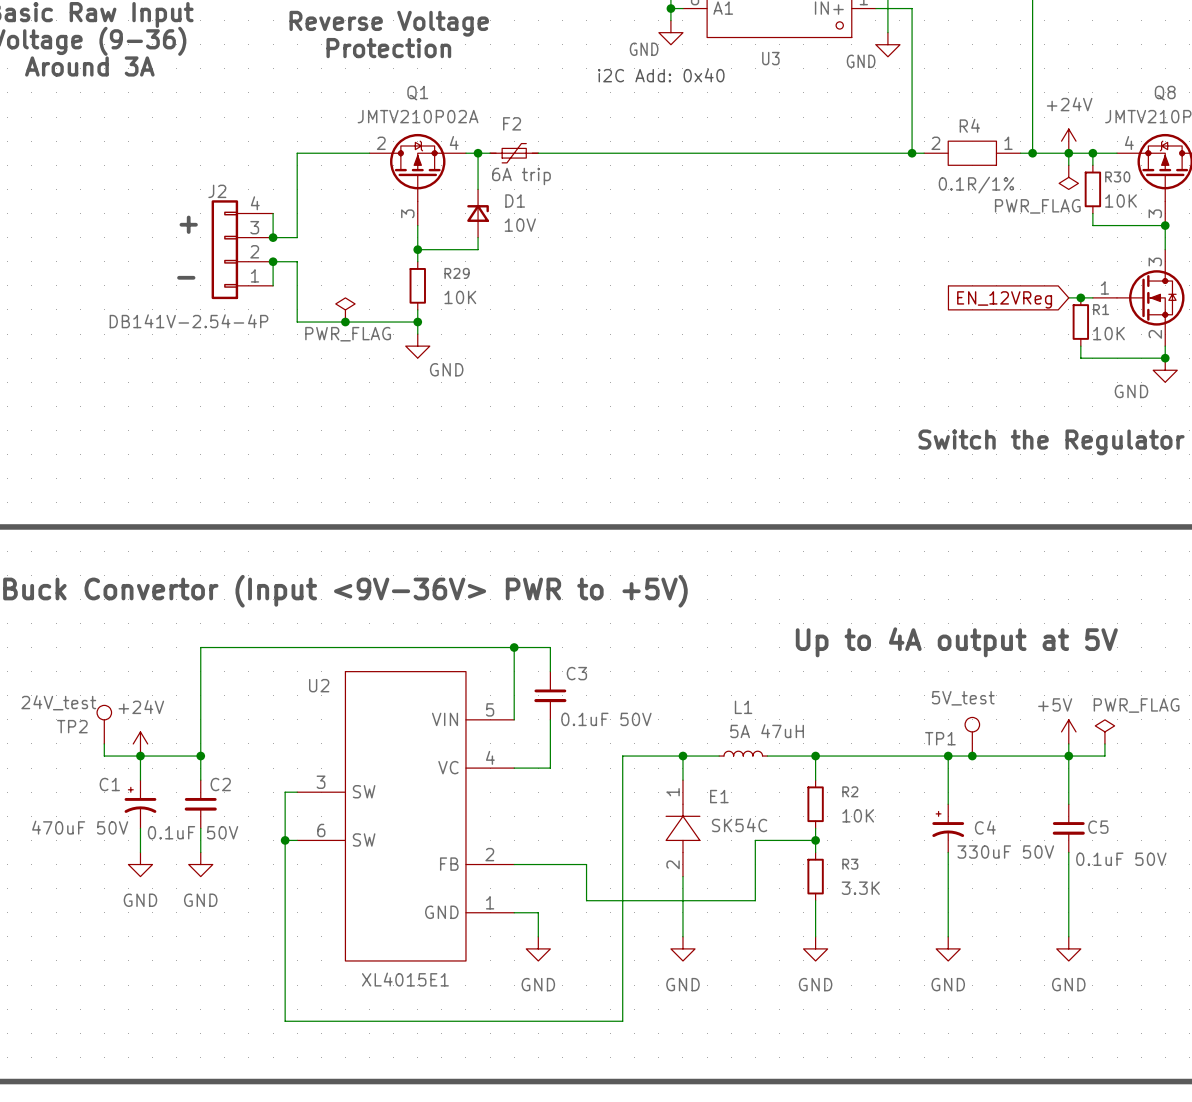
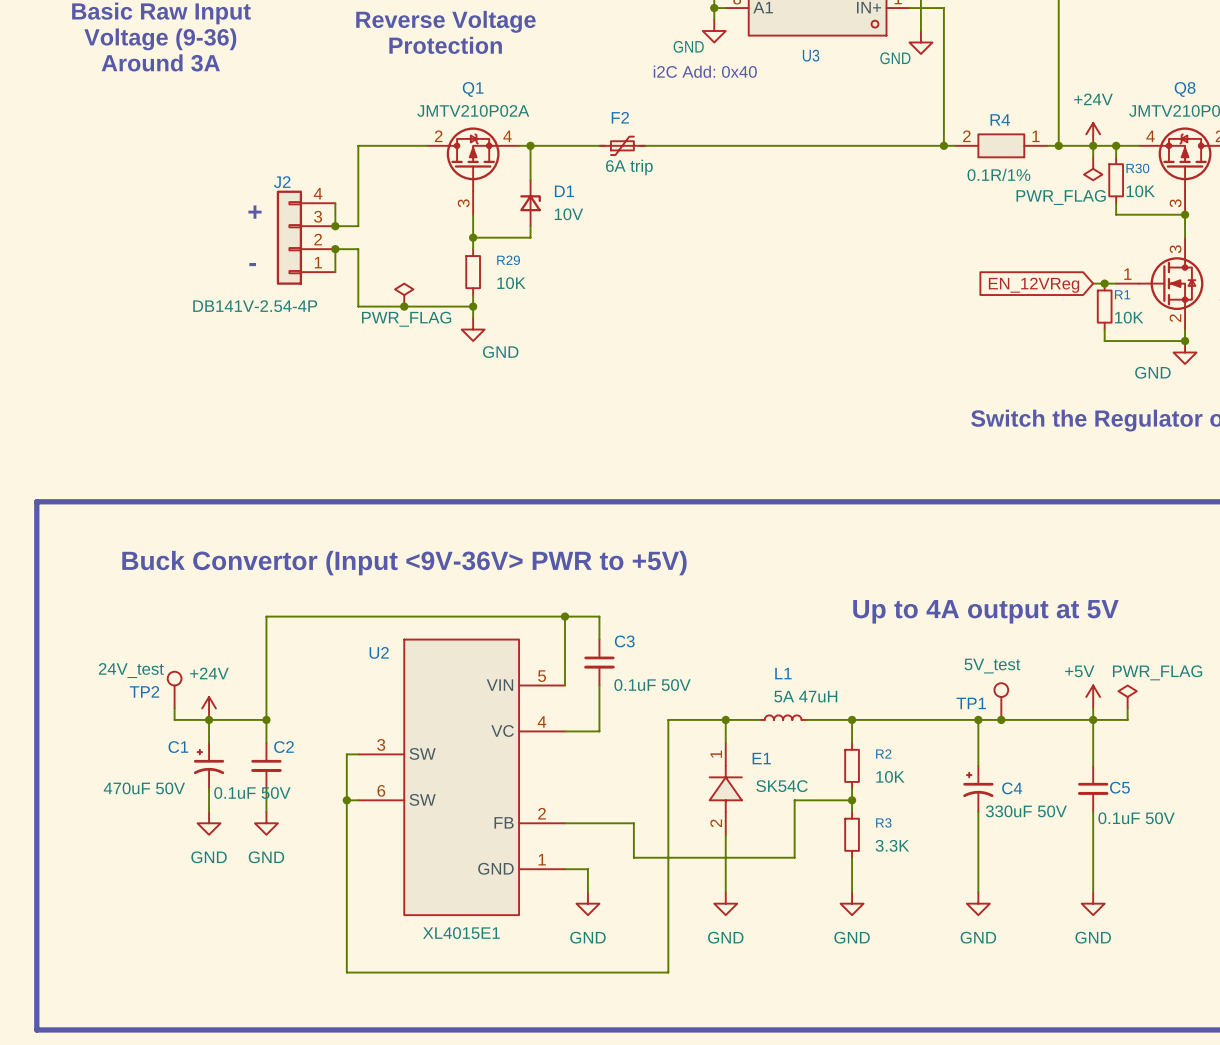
F2 position: (514, 153) -> (622, 145)

